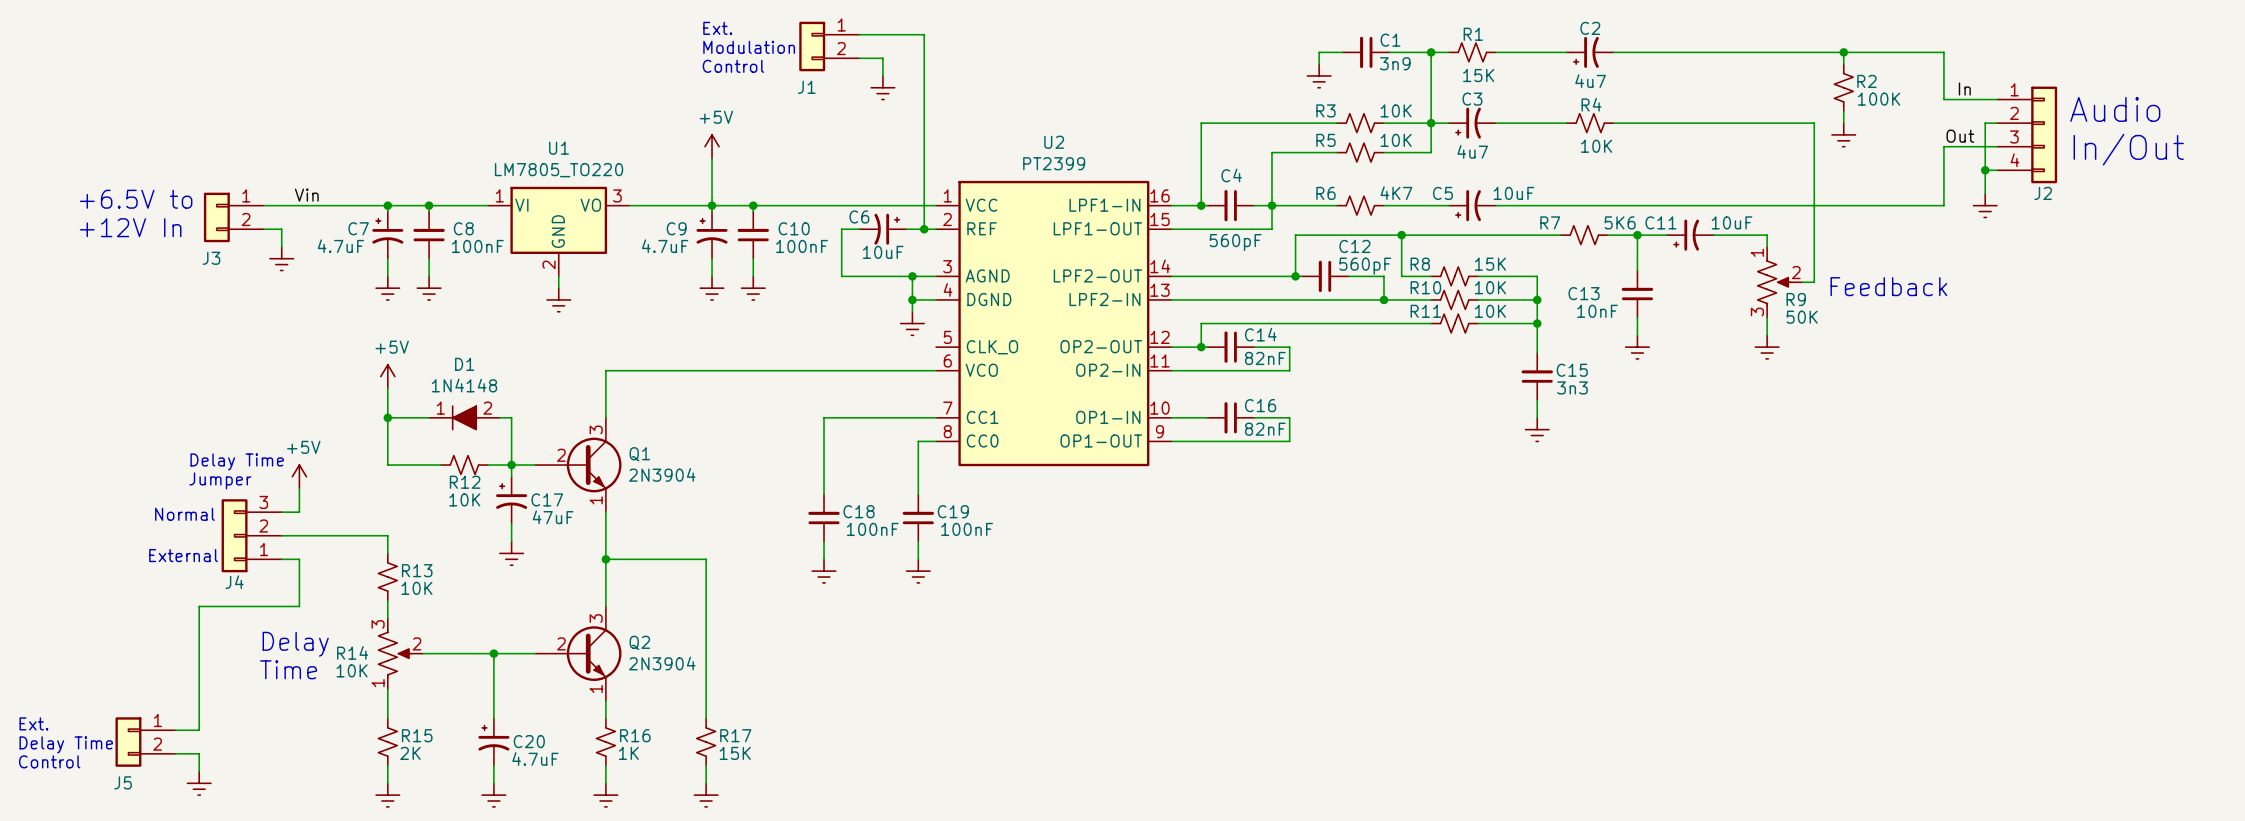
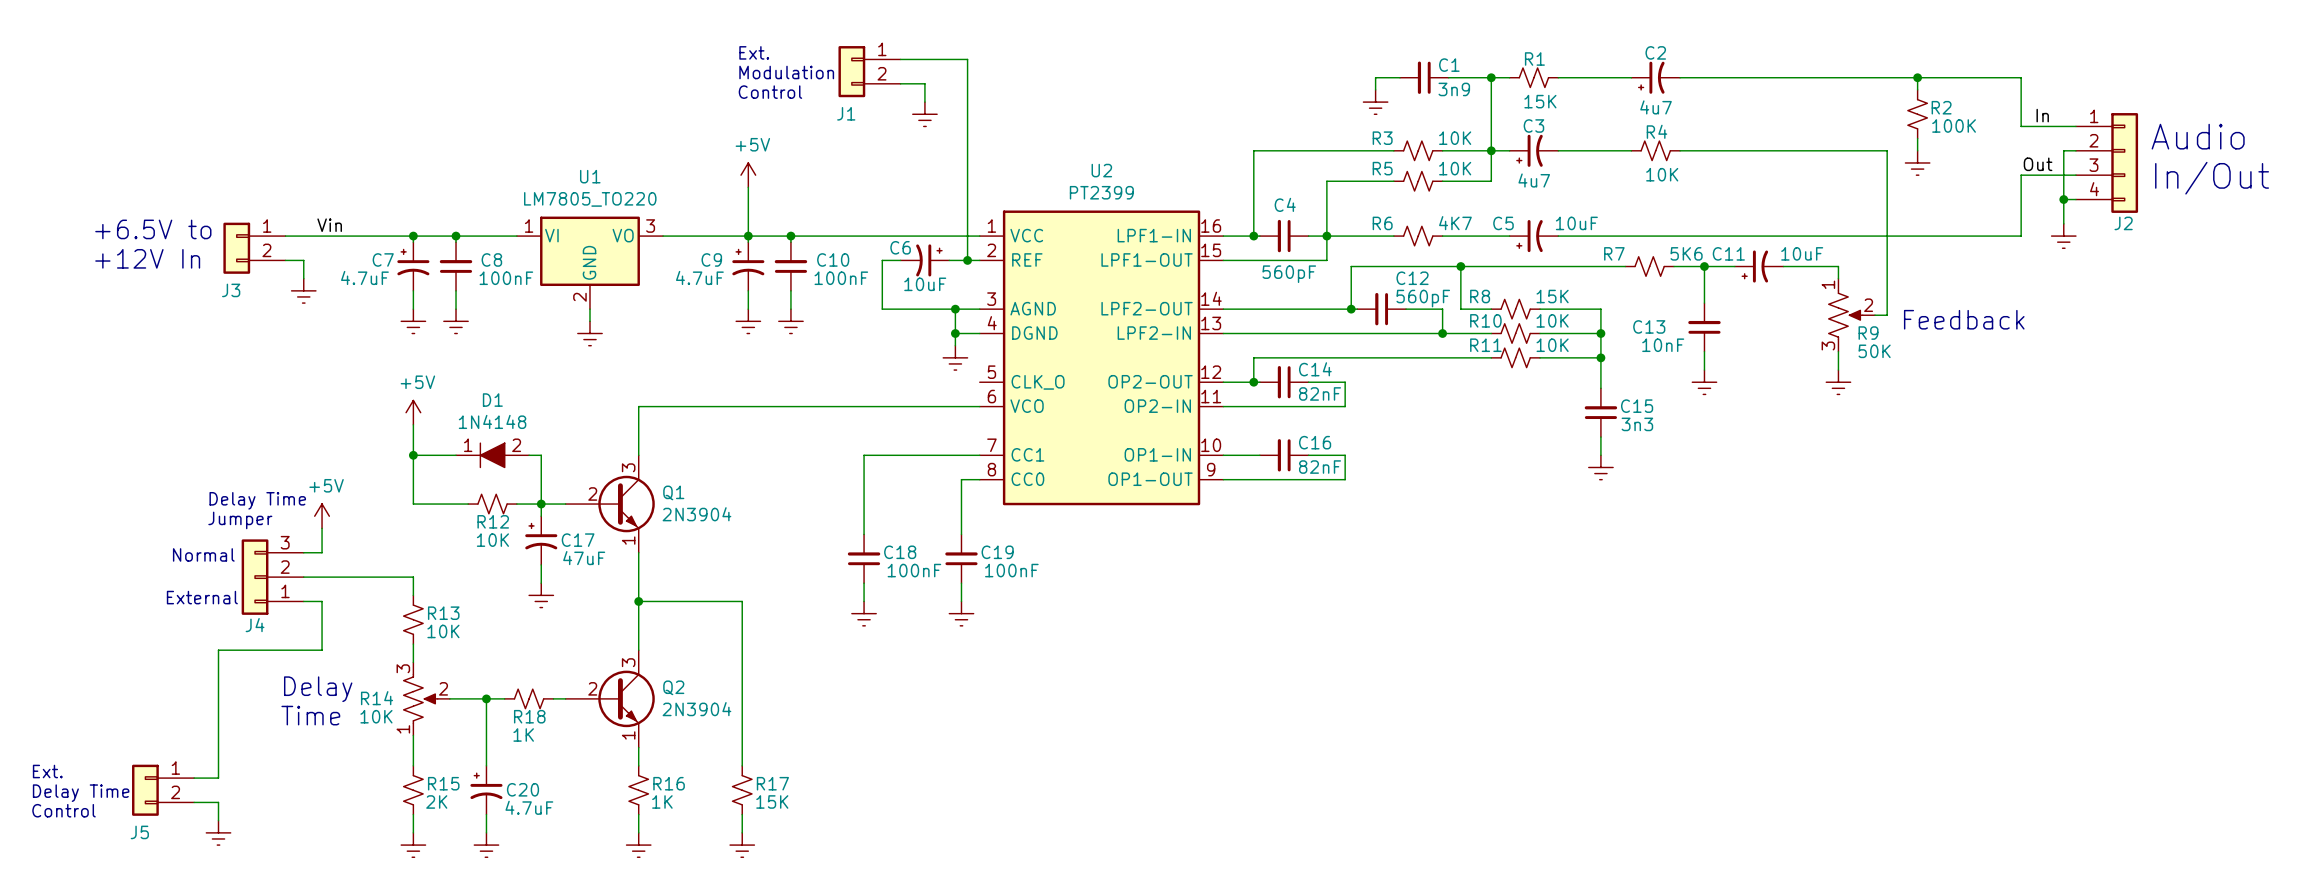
wire: (493, 653) (493, 718) -> (486, 698) (486, 765)
junction position: (493, 653) -> (486, 698)
R18: none -> 1K (529, 698)
C20 position: (493, 742) -> (486, 790)
wire: (493, 765) (493, 783) -> (486, 814) (486, 832)
power symbol position: (493, 795) -> (486, 845)

